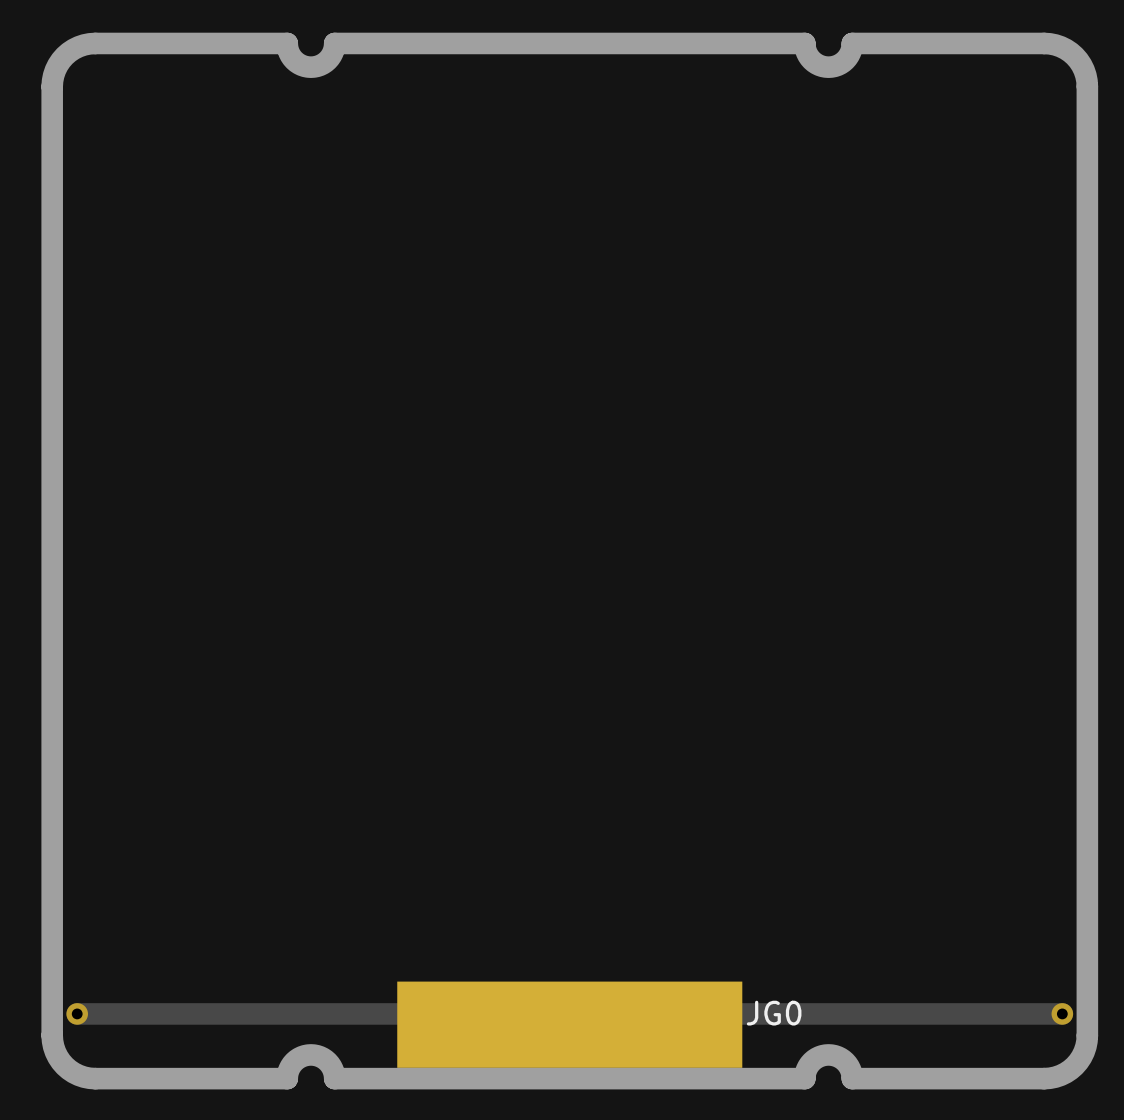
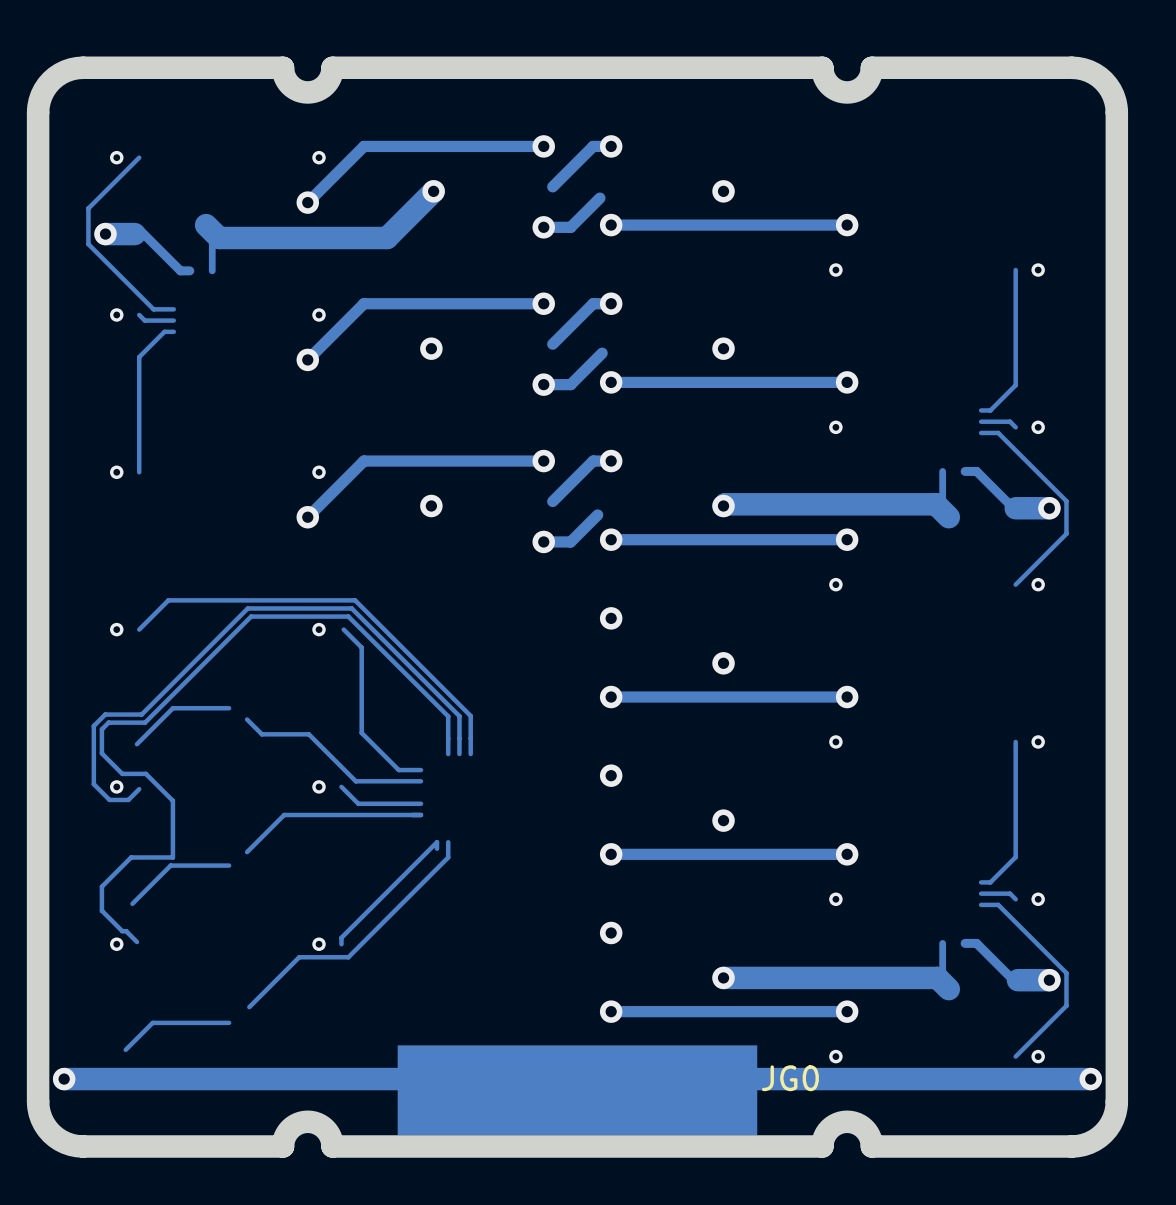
track: none -> (543, 146) (363, 146) (307, 202)
via: none -> (543, 146)
track: none -> (611, 146) (593, 146) (552, 186)
via: none -> (611, 146)
via: none -> (116, 157)
track: none -> (139, 157) (88, 208) (88, 244) (153, 309) (173, 309)
via: none -> (319, 157)
track: none -> (433, 191) (386, 238) (219, 238) (206, 225)
via: none -> (433, 191)
via: none -> (723, 191)
track: none -> (599, 198) (570, 227) (543, 227)
via: none -> (307, 202)
via: none -> (611, 225)
track: none -> (847, 225) (611, 225)
via: none -> (847, 225)
via: none -> (543, 227)
track: none -> (141, 231) (180, 270) (189, 270)
track: none -> (212, 232) (212, 270)
via: none -> (105, 234)
track: none -> (134, 234) (105, 234)
via: none -> (835, 270)
track: none -> (1015, 270) (1015, 385) (990, 410) (981, 410)
via: none -> (1038, 270)
track: none -> (543, 303) (363, 303) (307, 359)
via: none -> (543, 303)
track: none -> (611, 303) (593, 303) (552, 344)
via: none -> (611, 303)
via: none -> (116, 314)
track: none -> (139, 314) (144, 320) (173, 320)
via: none -> (319, 314)
track: none -> (173, 331) (164, 331) (139, 357) (139, 472)
via: none -> (431, 348)
via: none -> (723, 348)
track: none -> (602, 353) (570, 384) (543, 384)
via: none -> (307, 359)
via: none -> (611, 382)
track: none -> (847, 382) (611, 382)
via: none -> (847, 382)
via: none -> (543, 384)
track: none -> (981, 421) (1010, 421) (1015, 427)
via: none -> (835, 427)
via: none -> (1038, 427)
track: none -> (981, 432) (998, 432) (1066, 501) (1066, 533) (1015, 584)
track: none -> (543, 461) (363, 461) (307, 517)
via: none -> (543, 461)
track: none -> (611, 461) (593, 461) (552, 501)
via: none -> (611, 461)
track: none -> (942, 471) (942, 507)
track: none -> (965, 471) (976, 471) (1011, 506)
via: none -> (116, 472)
via: none -> (319, 472)
via: none -> (431, 506)
track: none -> (723, 506) (725, 504) (935, 504) (948, 517)
via: none -> (723, 506)
track: none -> (1049, 508) (1015, 508)
via: none -> (1049, 508)
track: none -> (597, 514) (570, 541) (543, 541)
via: none -> (307, 517)
via: none -> (611, 539)
track: none -> (847, 539) (611, 539)
via: none -> (847, 539)
via: none -> (543, 541)
via: none -> (835, 584)
via: none -> (1038, 584)
via: none -> (611, 618)
via: none -> (116, 629)
track: none -> (139, 629) (168, 600) (355, 600) (470, 715) (470, 754)
via: none -> (319, 629)
track: none -> (343, 629) (361, 647) (361, 732) (398, 770) (420, 770)
via: none -> (723, 663)
via: none -> (611, 697)
track: none -> (847, 697) (611, 697)
via: none -> (847, 697)
track: none -> (229, 708) (172, 708) (136, 744)
track: none -> (247, 719) (261, 734) (308, 734) (355, 781) (420, 781)
via: none -> (835, 741)
track: none -> (1015, 741) (1015, 857) (990, 882) (981, 882)
via: none -> (1038, 741)
track: none -> (448, 754) (448, 716) (348, 616) (251, 616) (145, 722) (108, 722) (101, 729) (101, 753) (122, 773) (145, 773) (172, 800) (172, 857) (131, 857) (101, 886) (101, 910) (122, 931) (126, 931) (136, 941)
track: none -> (459, 754) (459, 716) (351, 608) (247, 608) (141, 714) (105, 714) (93, 726) (93, 784) (109, 799) (128, 799) (139, 789)
via: none -> (611, 775)
via: none -> (116, 786)
via: none -> (319, 786)
track: none -> (341, 786) (358, 803) (420, 803)
track: none -> (420, 815) (284, 815) (247, 852)
via: none -> (723, 820)
track: none -> (448, 842) (448, 857) (348, 957) (299, 957) (249, 1007)
track: none -> (437, 848) (437, 842) (341, 937) (341, 944)
via: none -> (611, 854)
track: none -> (847, 854) (611, 854)
via: none -> (847, 854)
track: none -> (229, 865) (170, 865) (132, 903)
track: none -> (981, 893) (1010, 893) (1015, 899)
via: none -> (835, 899)
via: none -> (1038, 899)
track: none -> (981, 904) (998, 904) (1066, 973) (1066, 1005) (1015, 1056)
via: none -> (611, 932)
track: none -> (942, 943) (942, 983)
track: none -> (965, 943) (976, 943) (1011, 977)
via: none -> (116, 944)
via: none -> (319, 944)
track: none -> (723, 977) (937, 977) (948, 989)
via: none -> (723, 977)
track: none -> (1049, 980) (1017, 980)
via: none -> (1049, 980)
via: none -> (611, 1011)
track: none -> (847, 1011) (611, 1011)
via: none -> (847, 1011)
track: none -> (229, 1022) (152, 1022) (125, 1049)
via: none -> (835, 1056)
via: none -> (1038, 1056)

